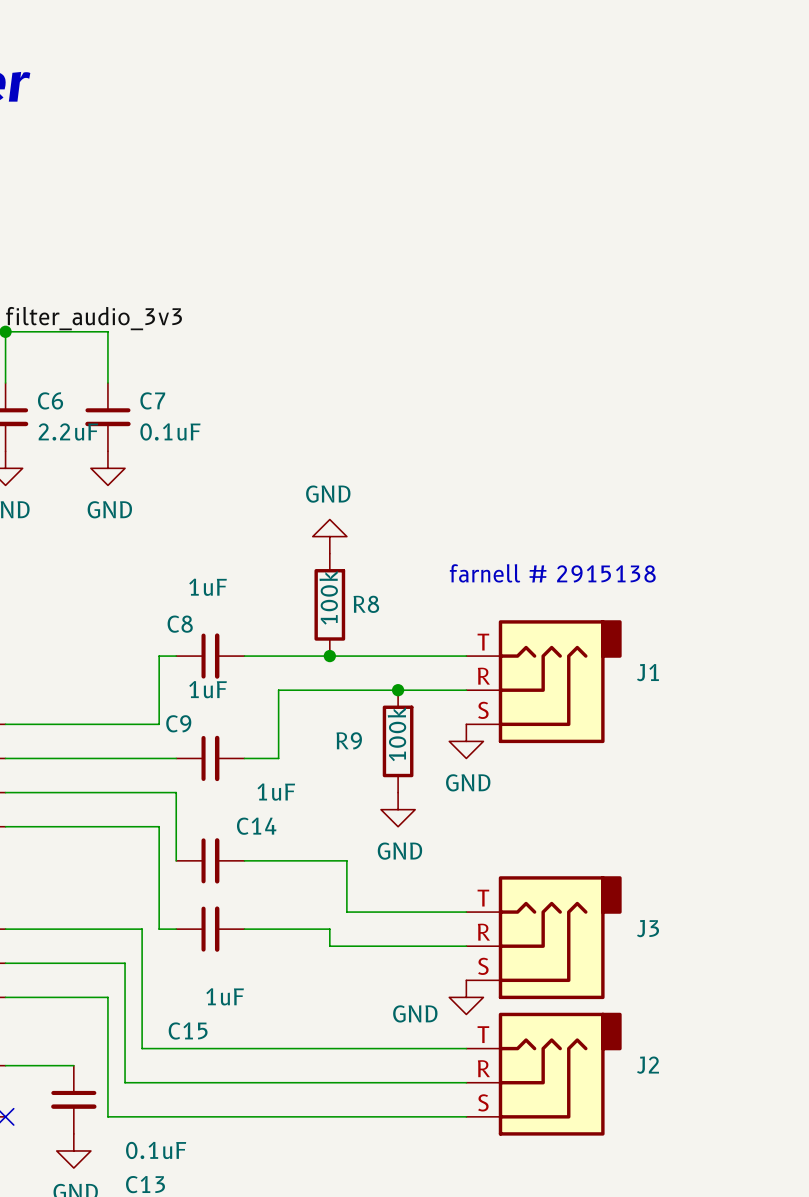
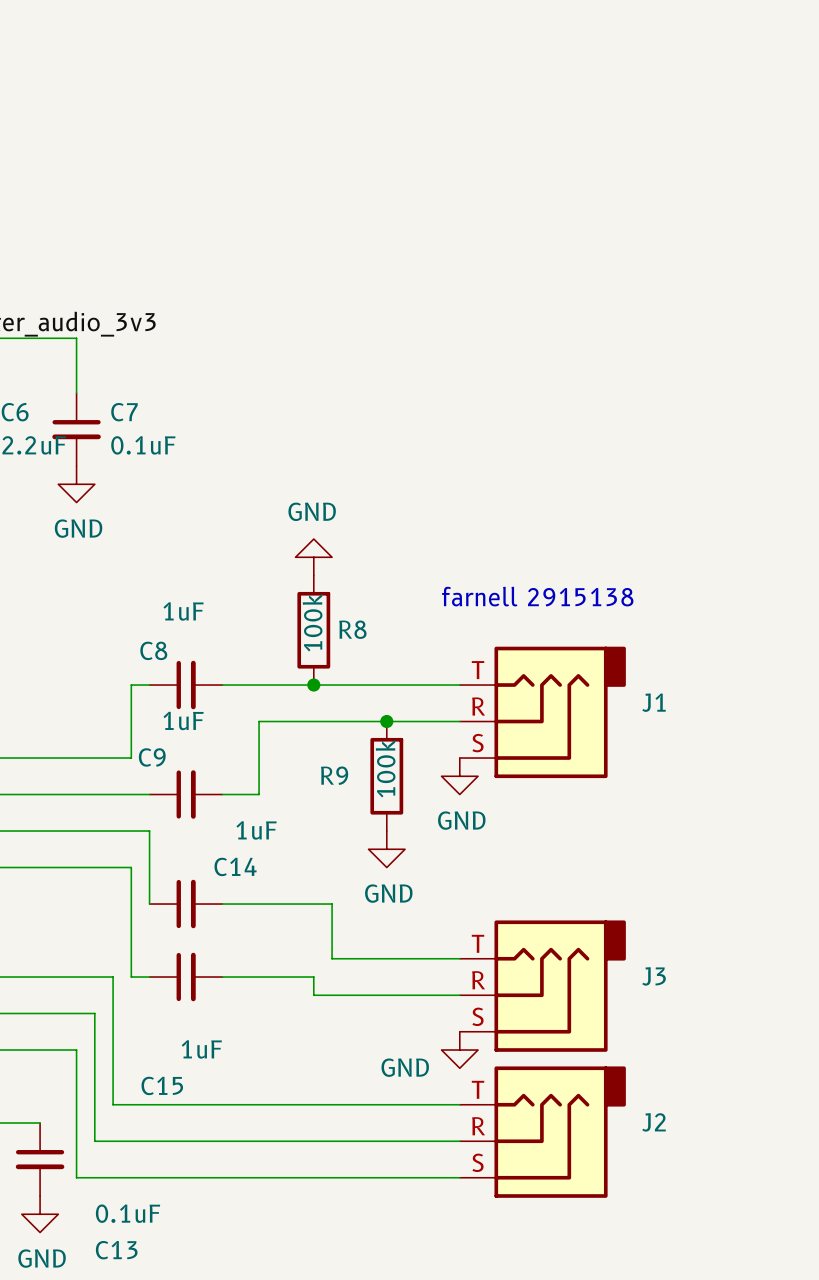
text: farnell # 2915138 (552, 573) -> farnell 2915138 (537, 596)

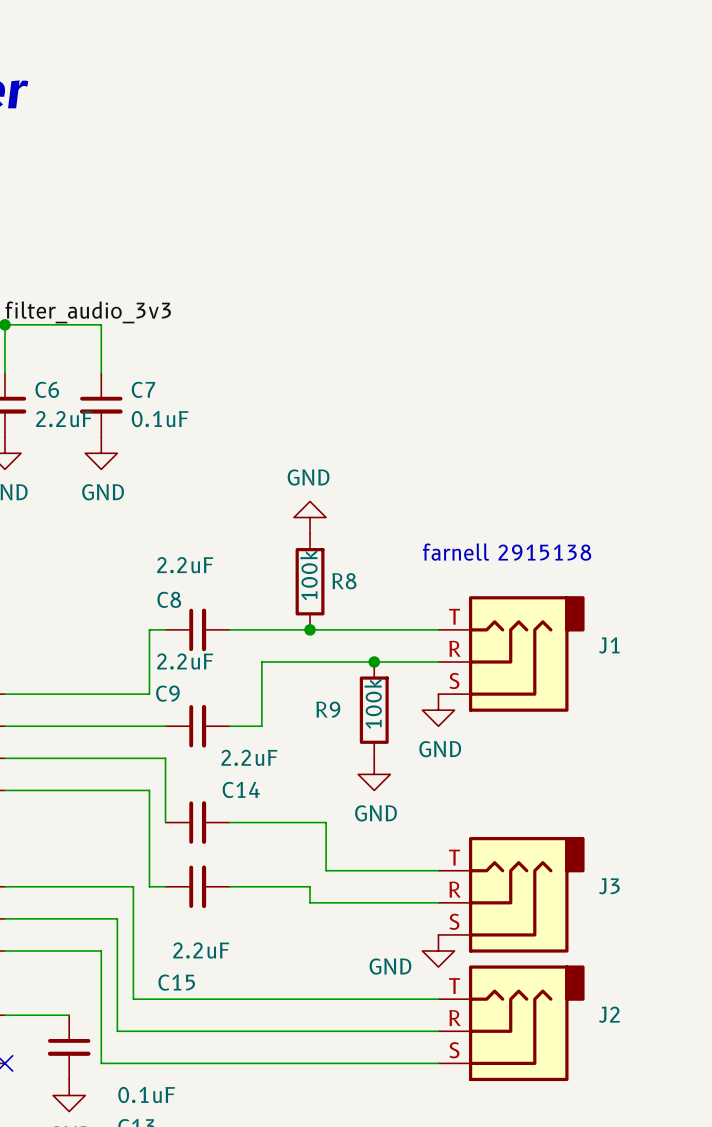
C8 value: 1uF (183, 611) -> 2.2uF (185, 565)
C9 value: 1uF (183, 720) -> 2.2uF (185, 661)
C14 value: 1uF (256, 830) -> 2.2uF (249, 757)
C15 value: 1uF (201, 1049) -> 2.2uF (201, 950)

